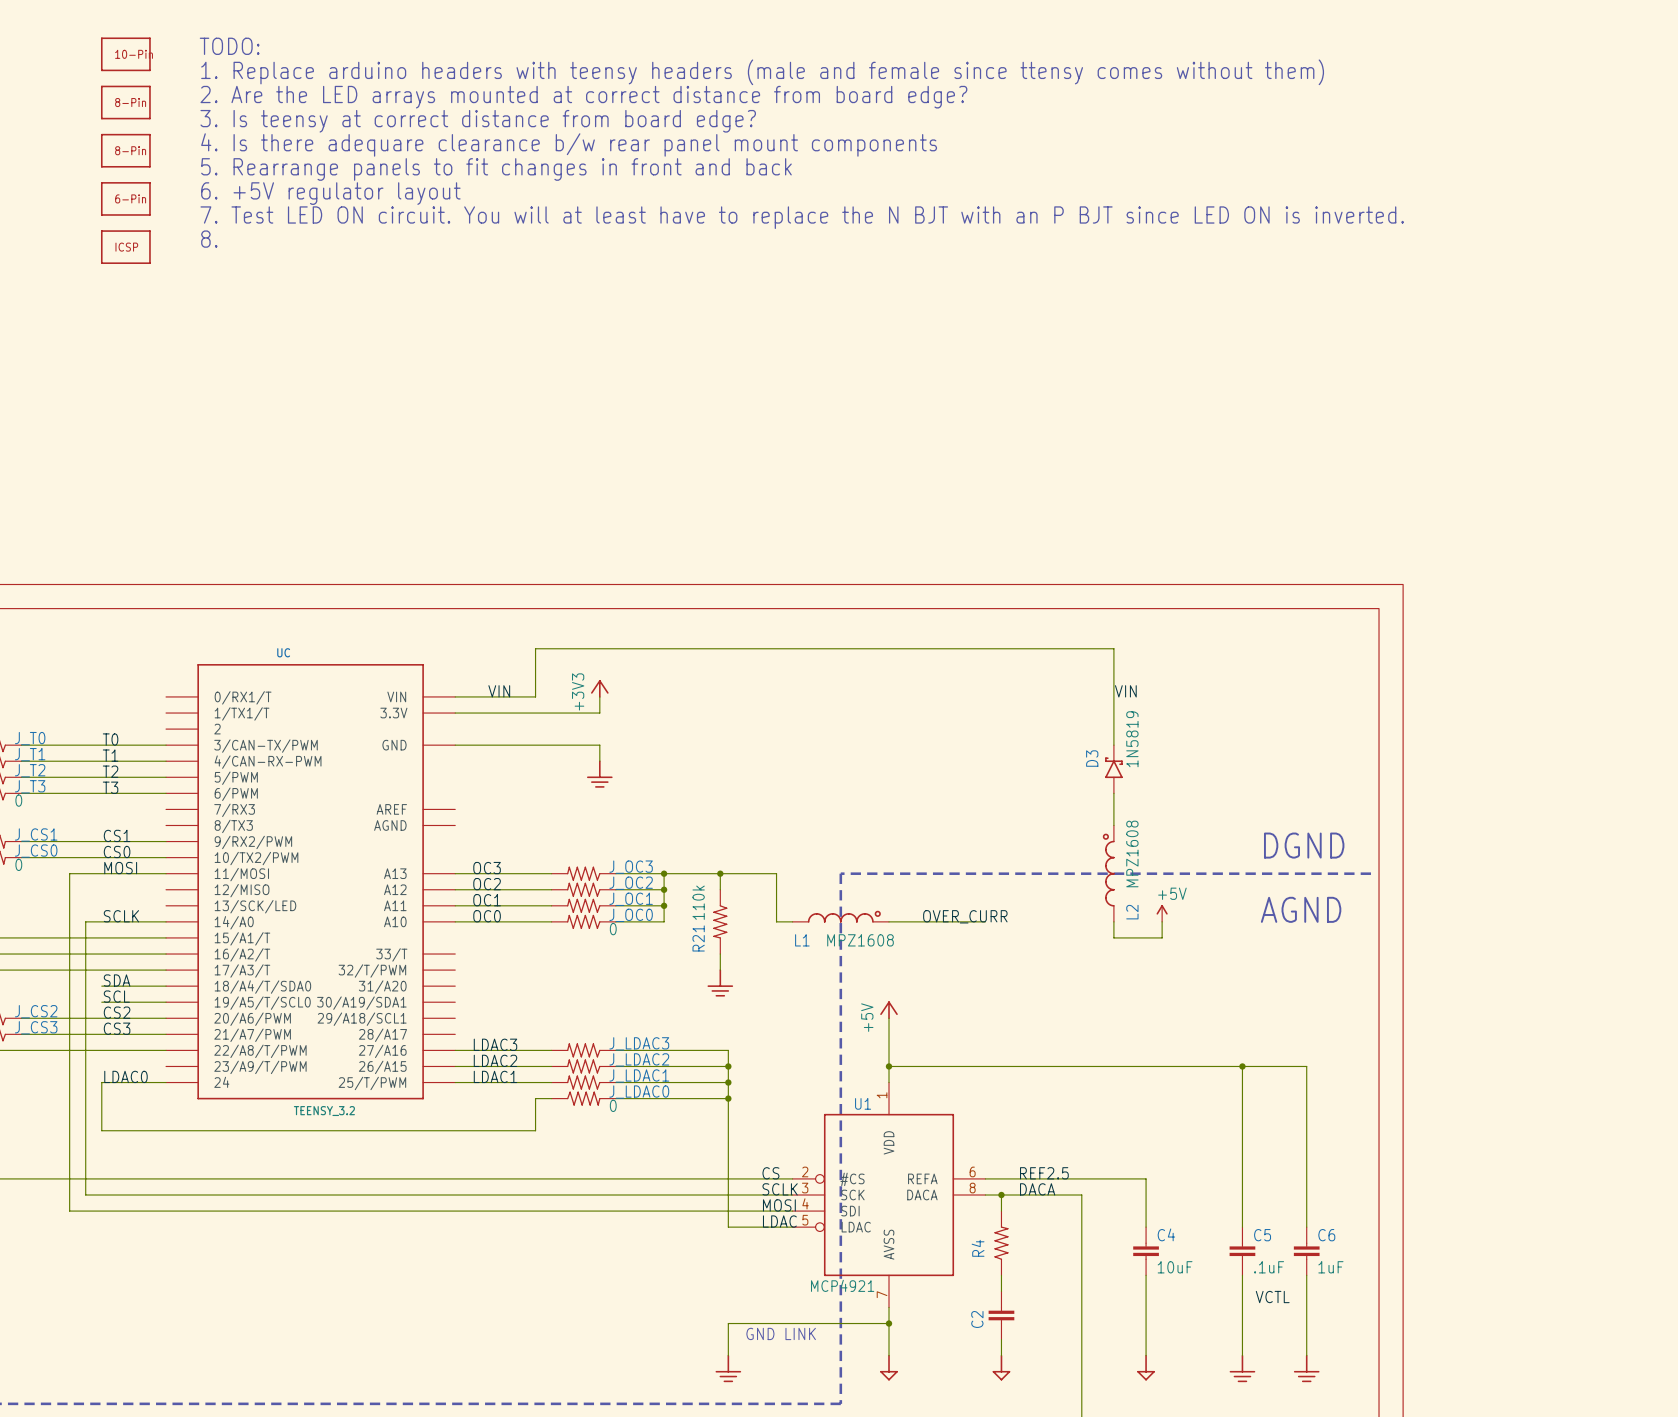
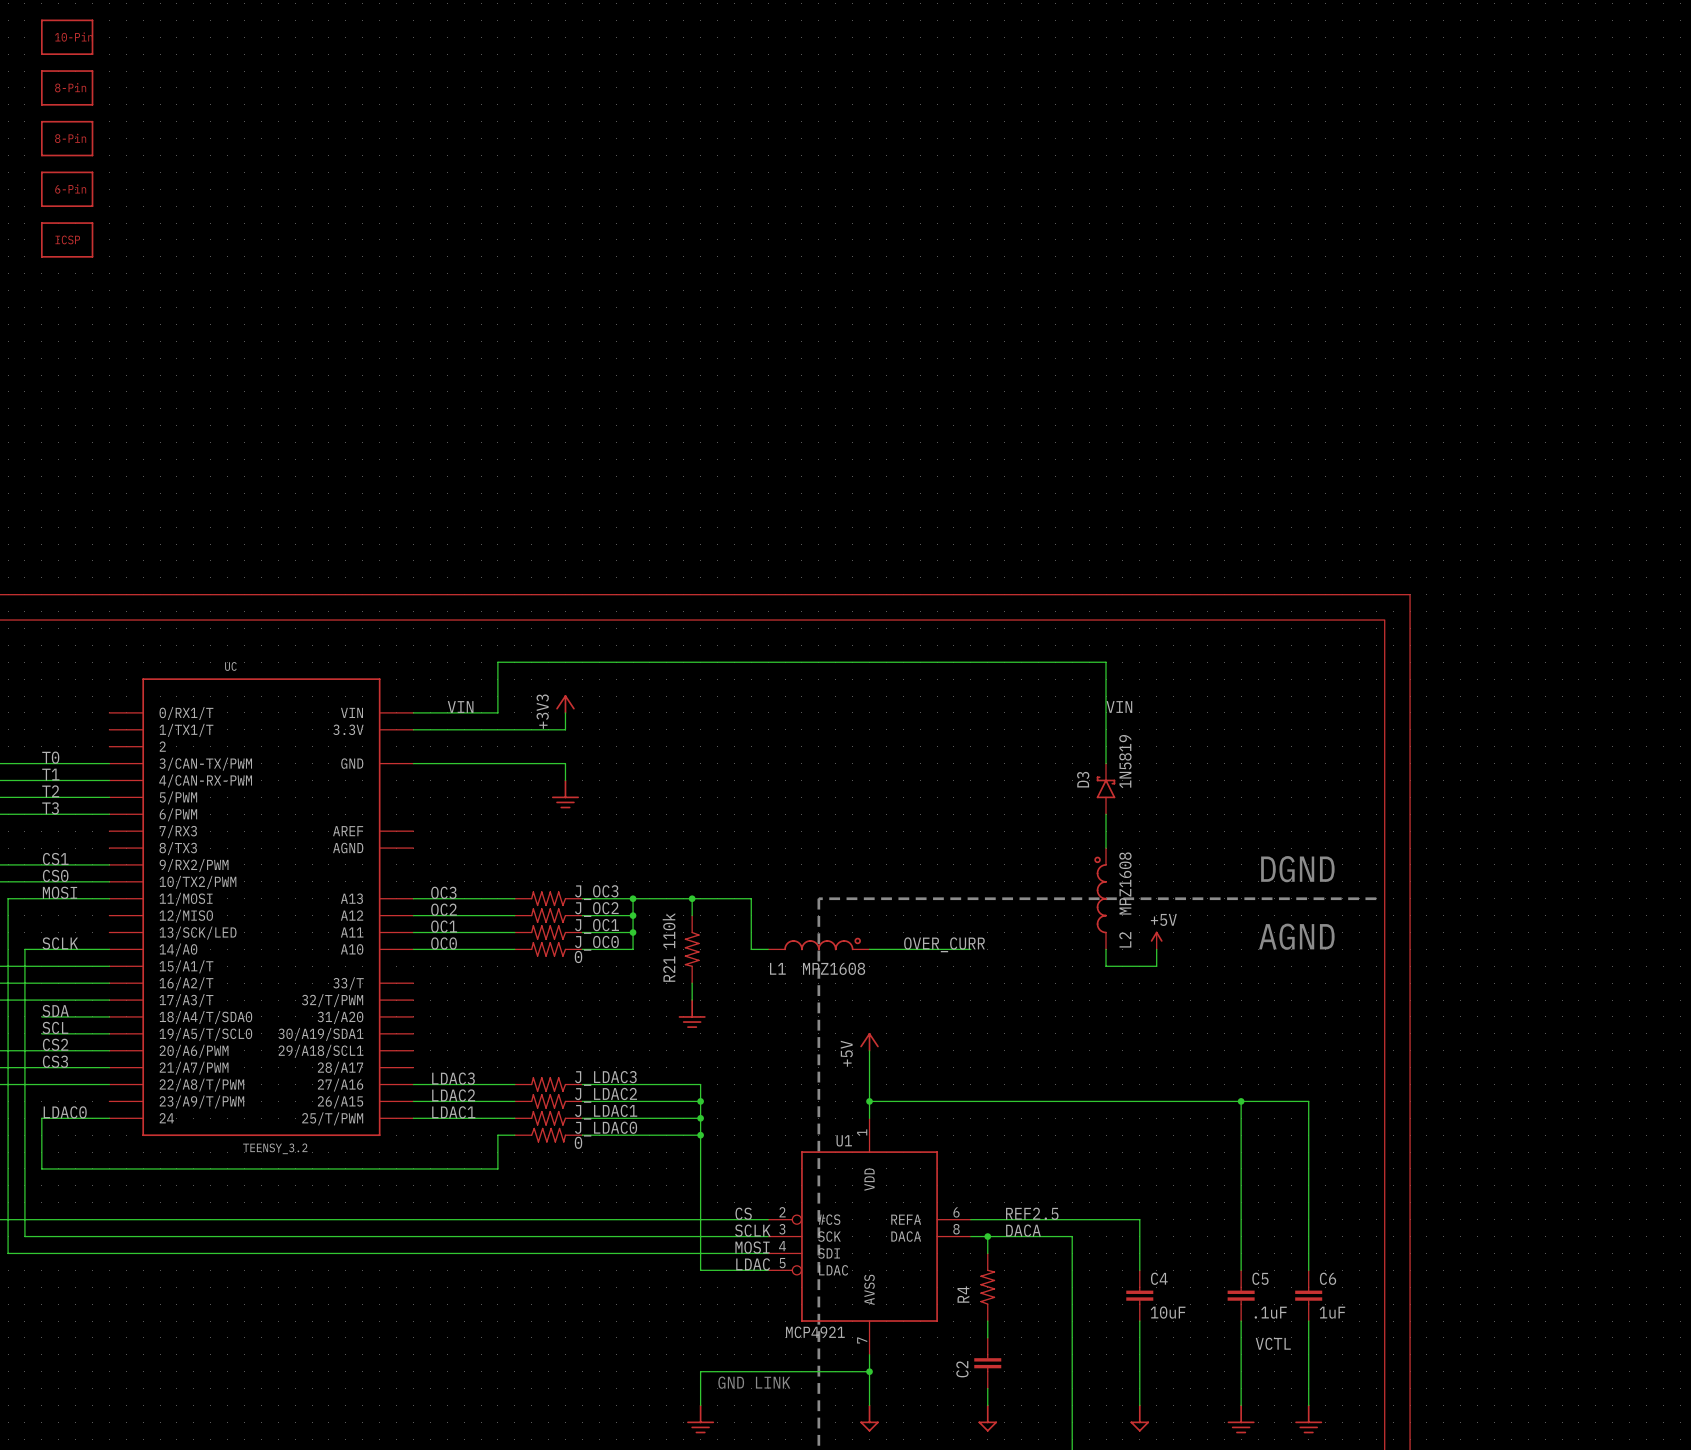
text: TODO: (229, 46) -> none
text: 1. Replace arduino headers with teensy headers (male and female since ttensy comes without them) (762, 72) -> none
text: 2. Are the LED arrays mounted at correct distance from board edge? (583, 97) -> none
text: 3. Is teensy at correct distance from board edge? (478, 121) -> none
text: 4. Is there adequare clearance b/w rear panel mount components (569, 144) -> none
text: 5. Rearrange panels to fit changes in front and back (496, 169) -> none
text: 6. +5V regulator layout (330, 193) -> none
text: 7. Test LED ON circuit. You will at least have to replace the N BJT with an P BJT since LED ON is inverted. (802, 217) -> none
text: 8. (209, 239) -> none

